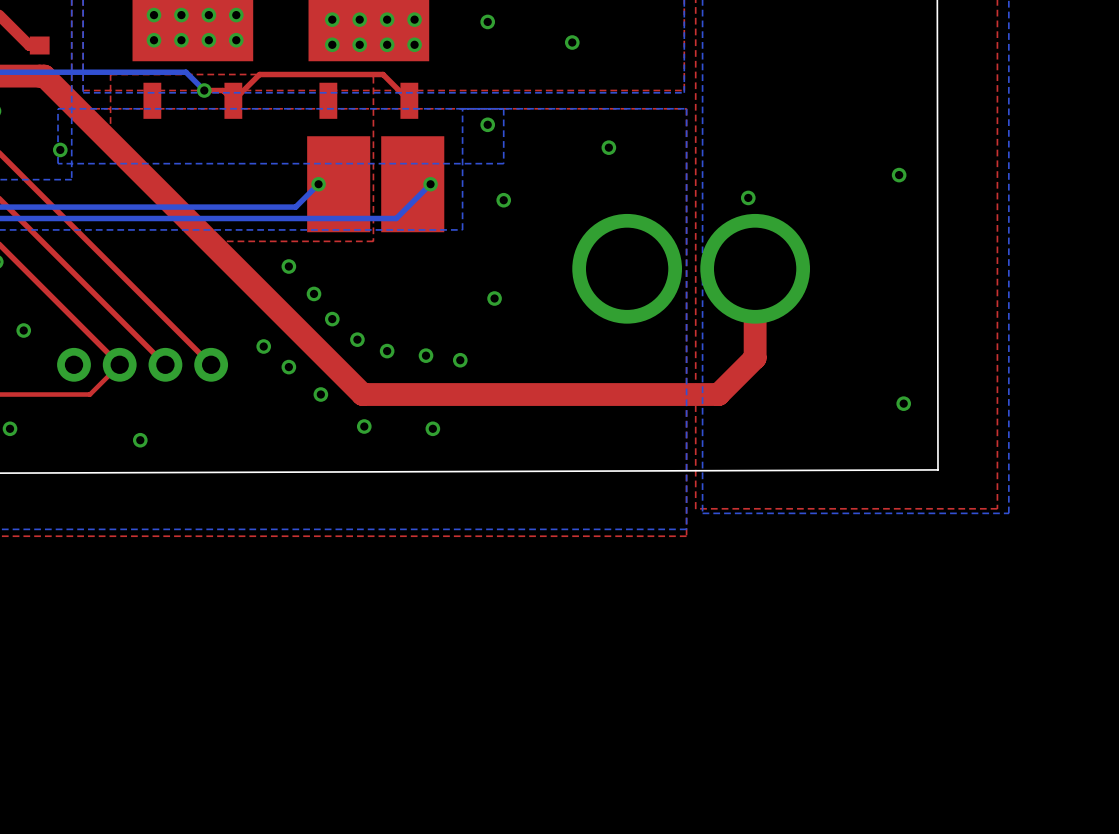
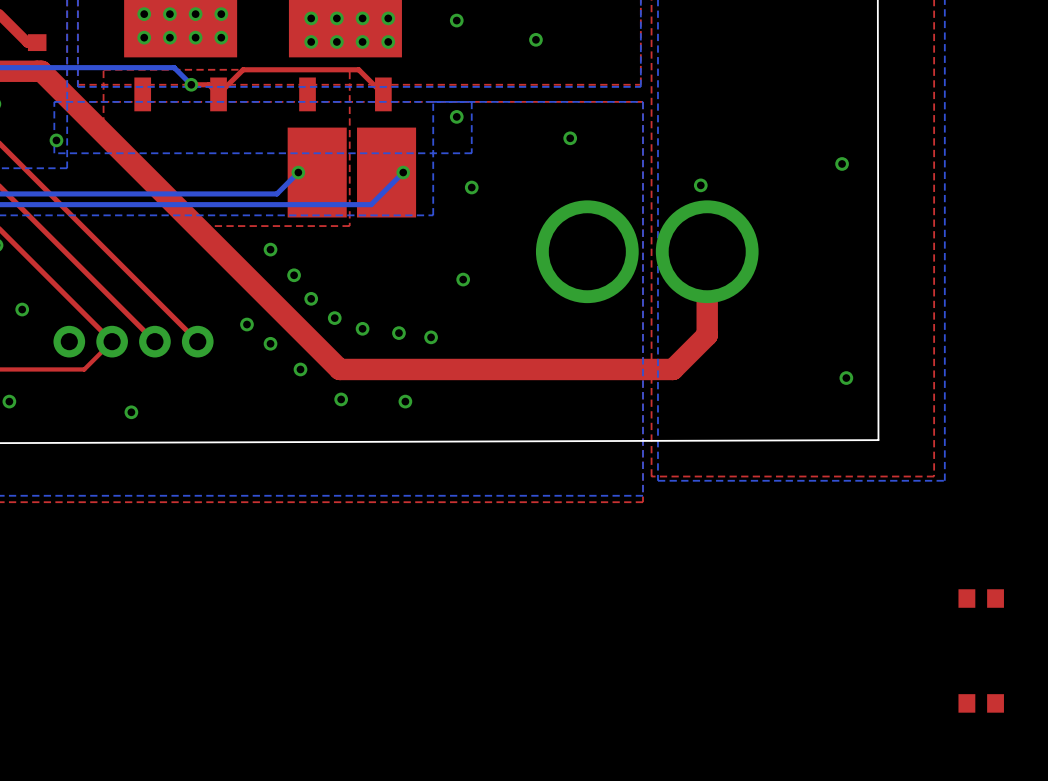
part: none -> (981, 598)
part: none -> (981, 703)

